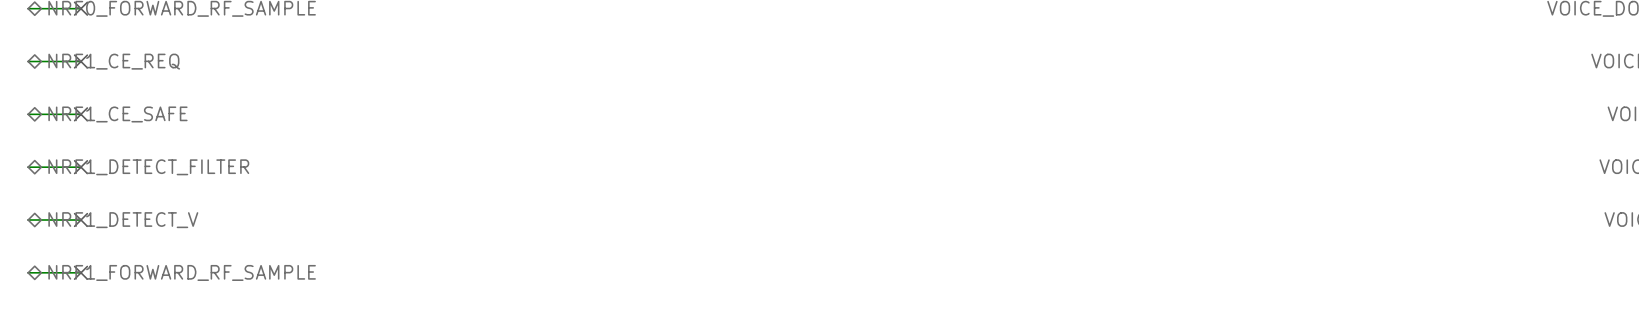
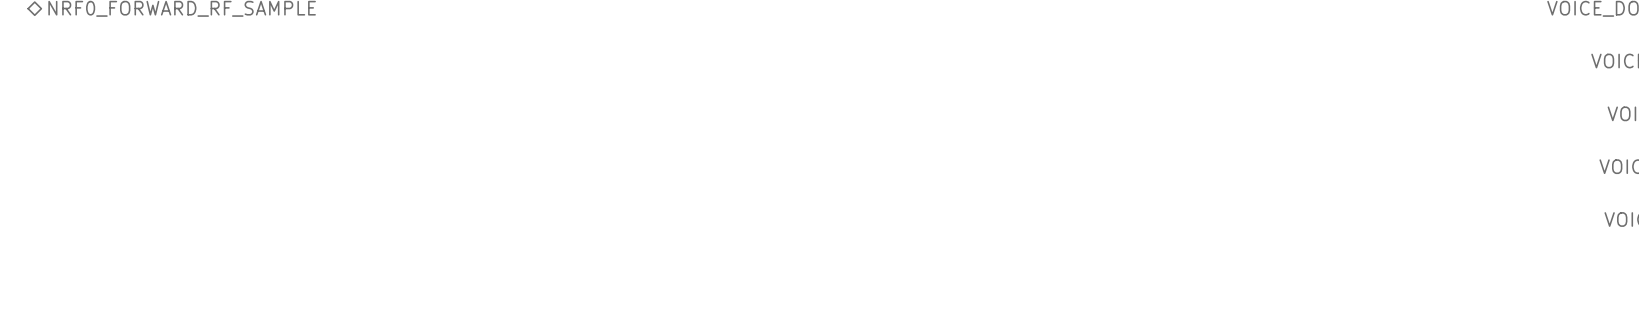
wire: (28, 8) (80, 8) -> none
no-connect mark: (80, 8) -> none
wire: (28, 61) (80, 61) -> none
no-connect mark: (80, 61) -> none
hierarchical label: NRF1_CE_REQ (114, 61) -> none
wire: (28, 114) (80, 114) -> none
no-connect mark: (80, 114) -> none
hierarchical label: NRF1_CE_SAFE (117, 114) -> none
wire: (28, 167) (80, 167) -> none
no-connect mark: (80, 167) -> none
hierarchical label: NRF1_DETECT_FILTER (148, 167) -> none
wire: (28, 219) (80, 219) -> none
no-connect mark: (80, 219) -> none
hierarchical label: NRF1_DETECT_V (123, 220) -> none
wire: (28, 272) (80, 272) -> none
no-connect mark: (80, 272) -> none
hierarchical label: NRF1_FORWARD_RF_SAMPLE (182, 272) -> none

